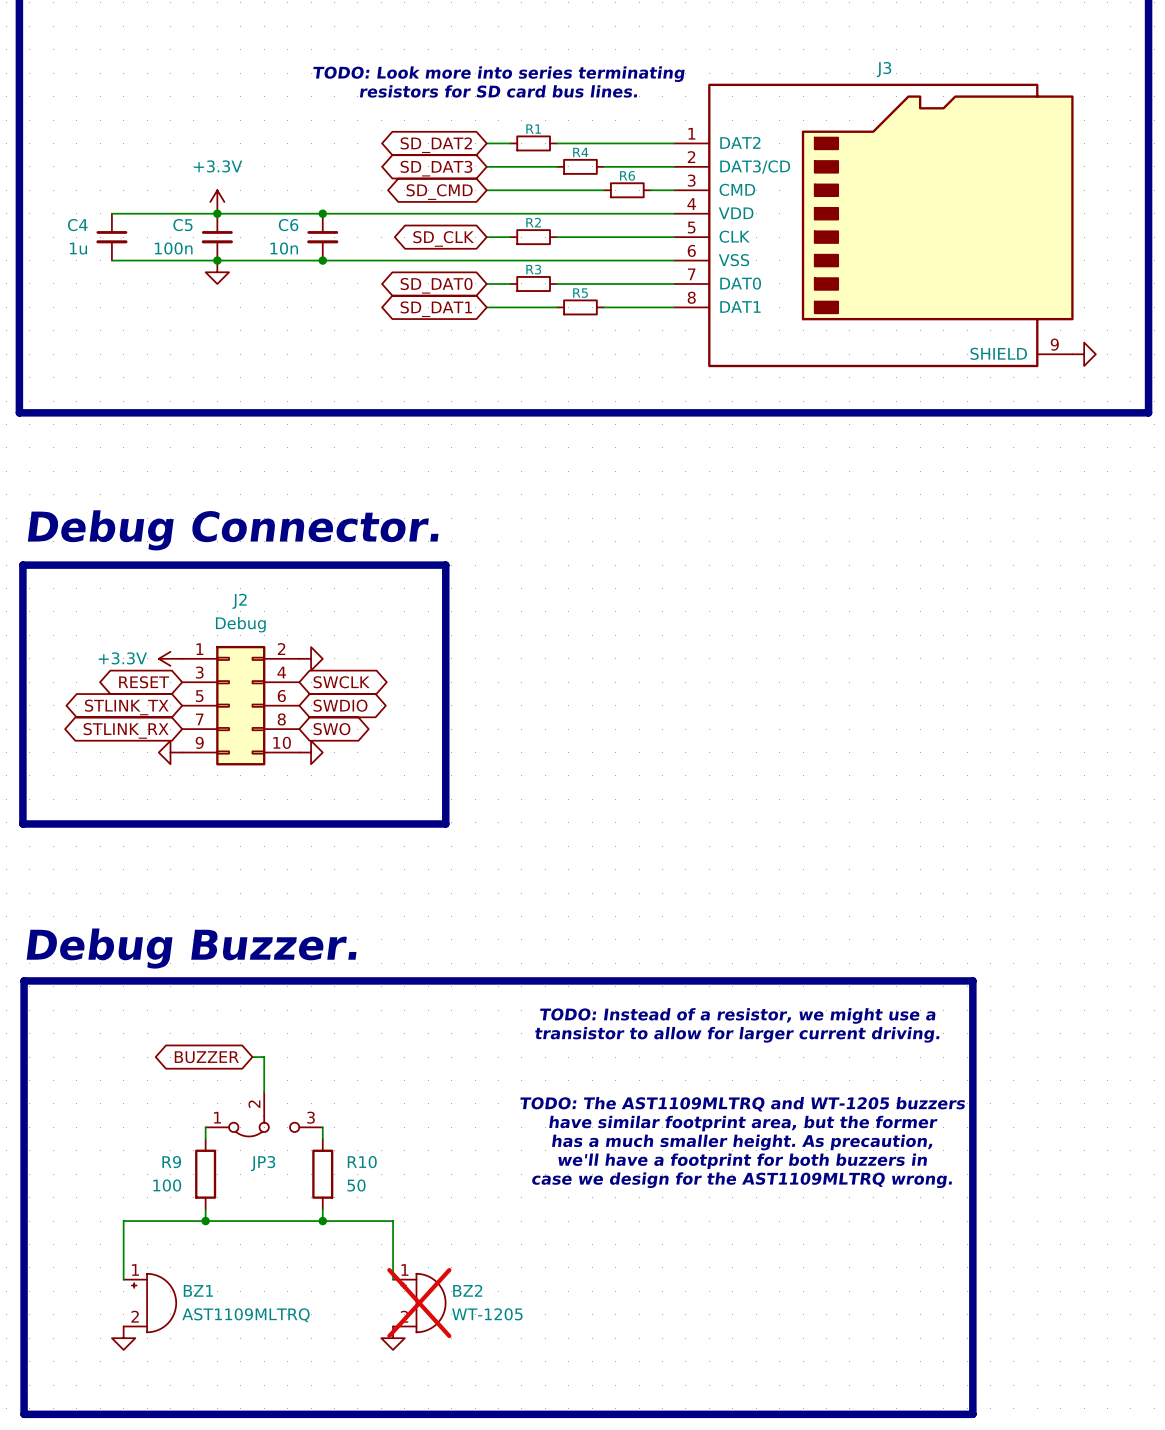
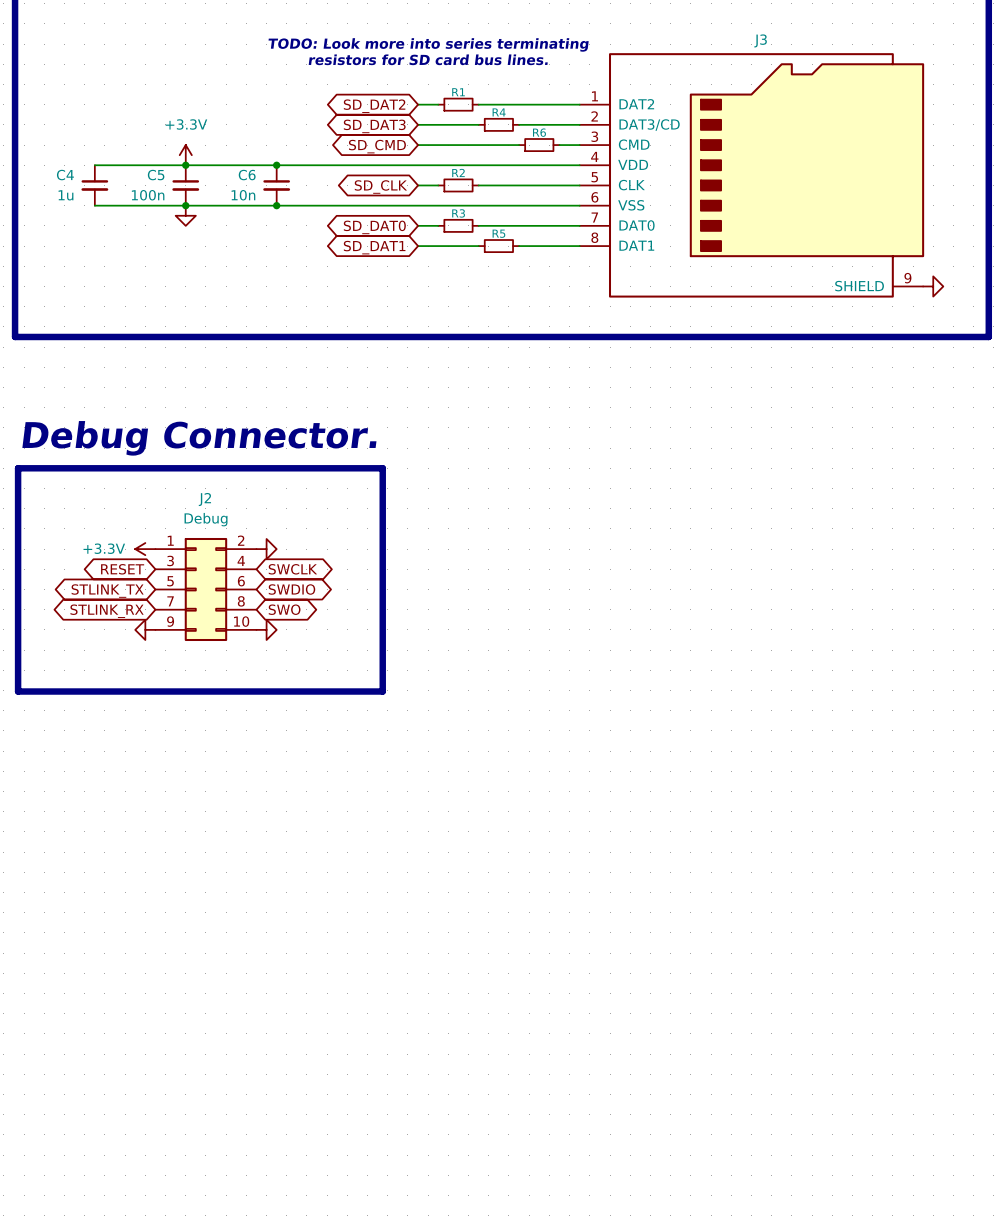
text: Debug Buzzer. (191, 948) -> none
line: (24, 980) (972, 980) (972, 1414) (24, 1414) (24, 980) -> none
text: TODO: Instead of a resistor, we might use a (737, 1015) -> none
text: transistor to allow for larger current driving. (737, 1034) -> none
global label: BUZZER (206, 1057) -> none
wire: (252, 1057) (264, 1057) (264, 1092) -> none
text: TODO: The AST1109MLTRQ and WT-1205 buzzers (742, 1104) -> none
JP3: (264, 1114) -> none
text: have similar footprint area, but the former (743, 1123) -> none
wire: (205, 1127) (205, 1139) -> none
wire: (322, 1127) (322, 1139) -> none
text: has a much smaller height. As precaution, (742, 1142) -> none
text: we'll have a footprint for both buzzers in (742, 1161) -> none
R9: 100 (205, 1174) -> none
R10: 50 (322, 1174) -> none
text: case we design for the AST1109MLTRQ wrong. (741, 1180) -> none
wire: (205, 1209) (205, 1221) -> none
wire: (322, 1209) (322, 1221) -> none
junction: (205, 1221) -> none
junction: (322, 1221) -> none
wire: (123, 1279) (123, 1221) (393, 1221) (393, 1279) -> none
BZ1: AST1109MLTRQ (149, 1303) -> none
BZ2: WT-1205 (419, 1303) -> none
power symbol: (123, 1338) -> none
power symbol: (393, 1338) -> none

